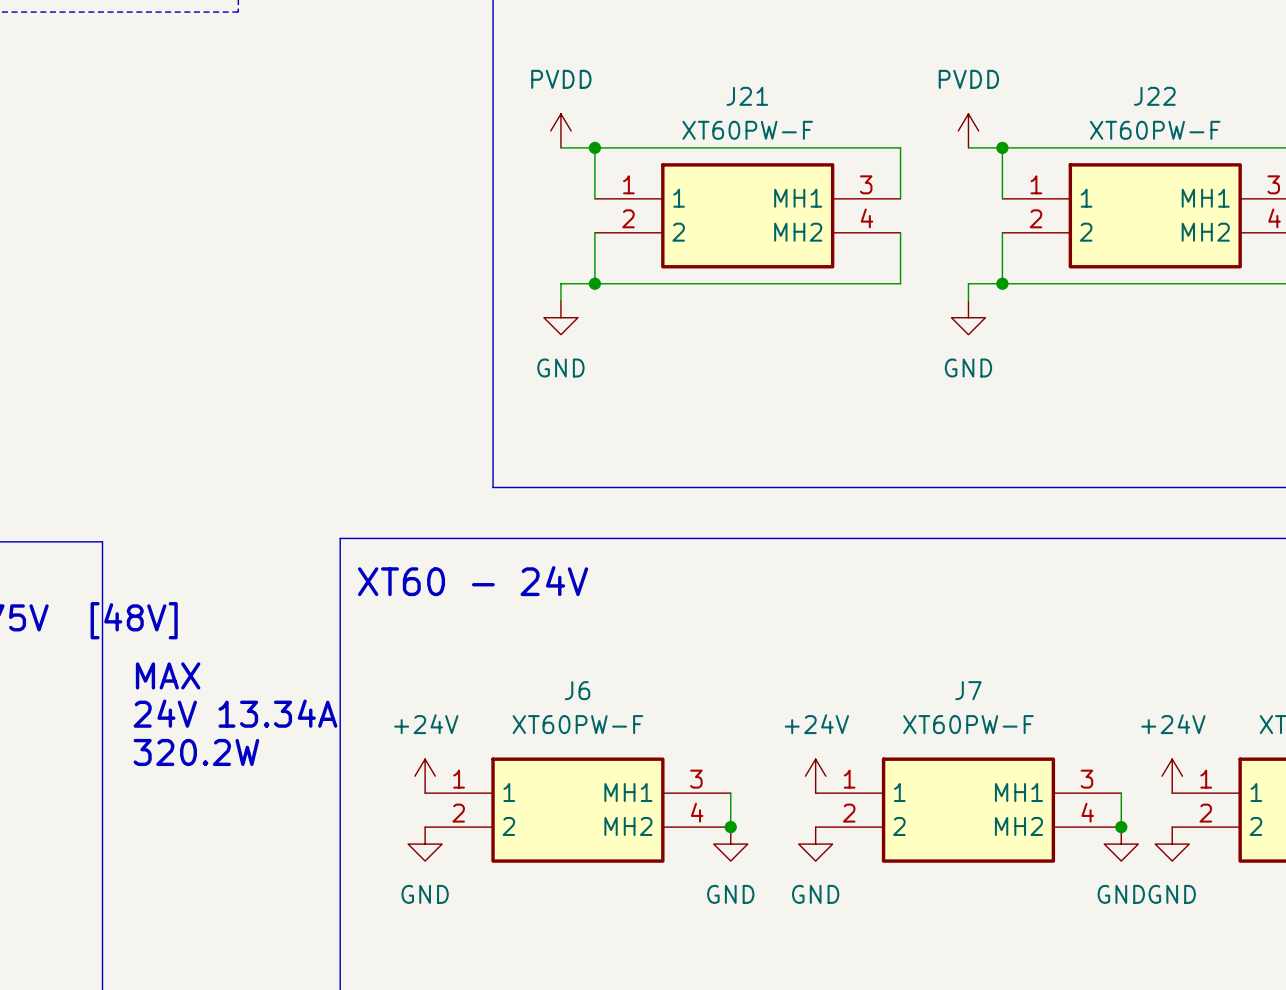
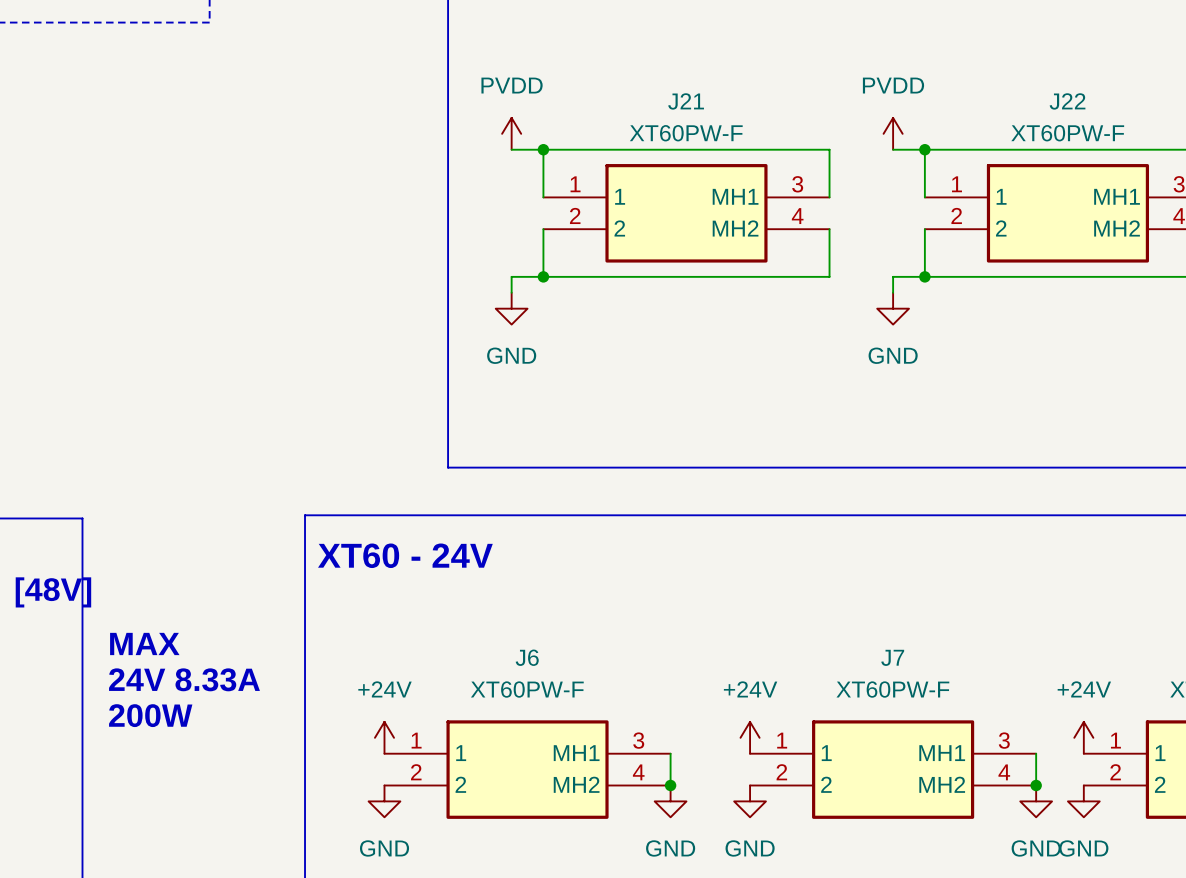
text: 24V 13.34A (235, 713) -> 24V 8.33A (184, 679)
text: 320.2W (196, 752) -> 200W (150, 715)

